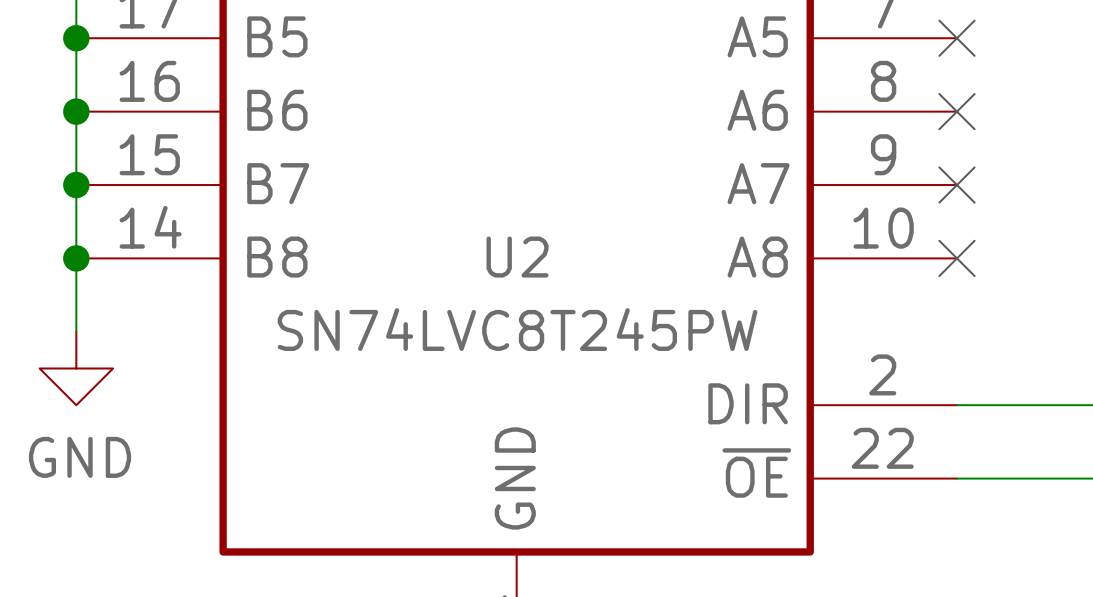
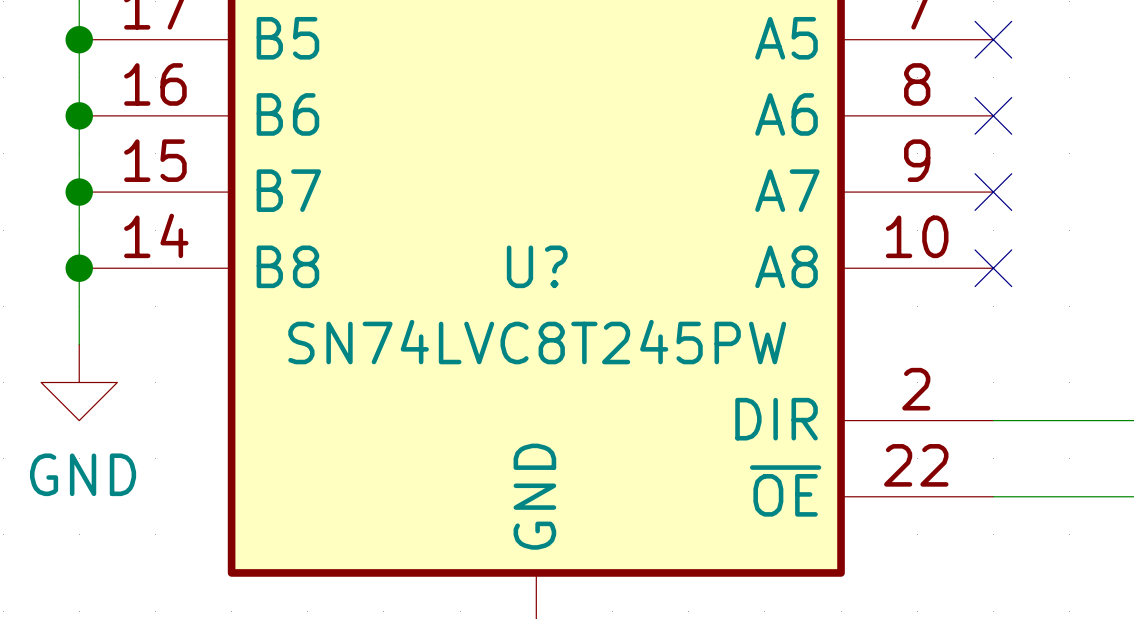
U2 name: U2 (517, 257) -> U? (537, 266)

